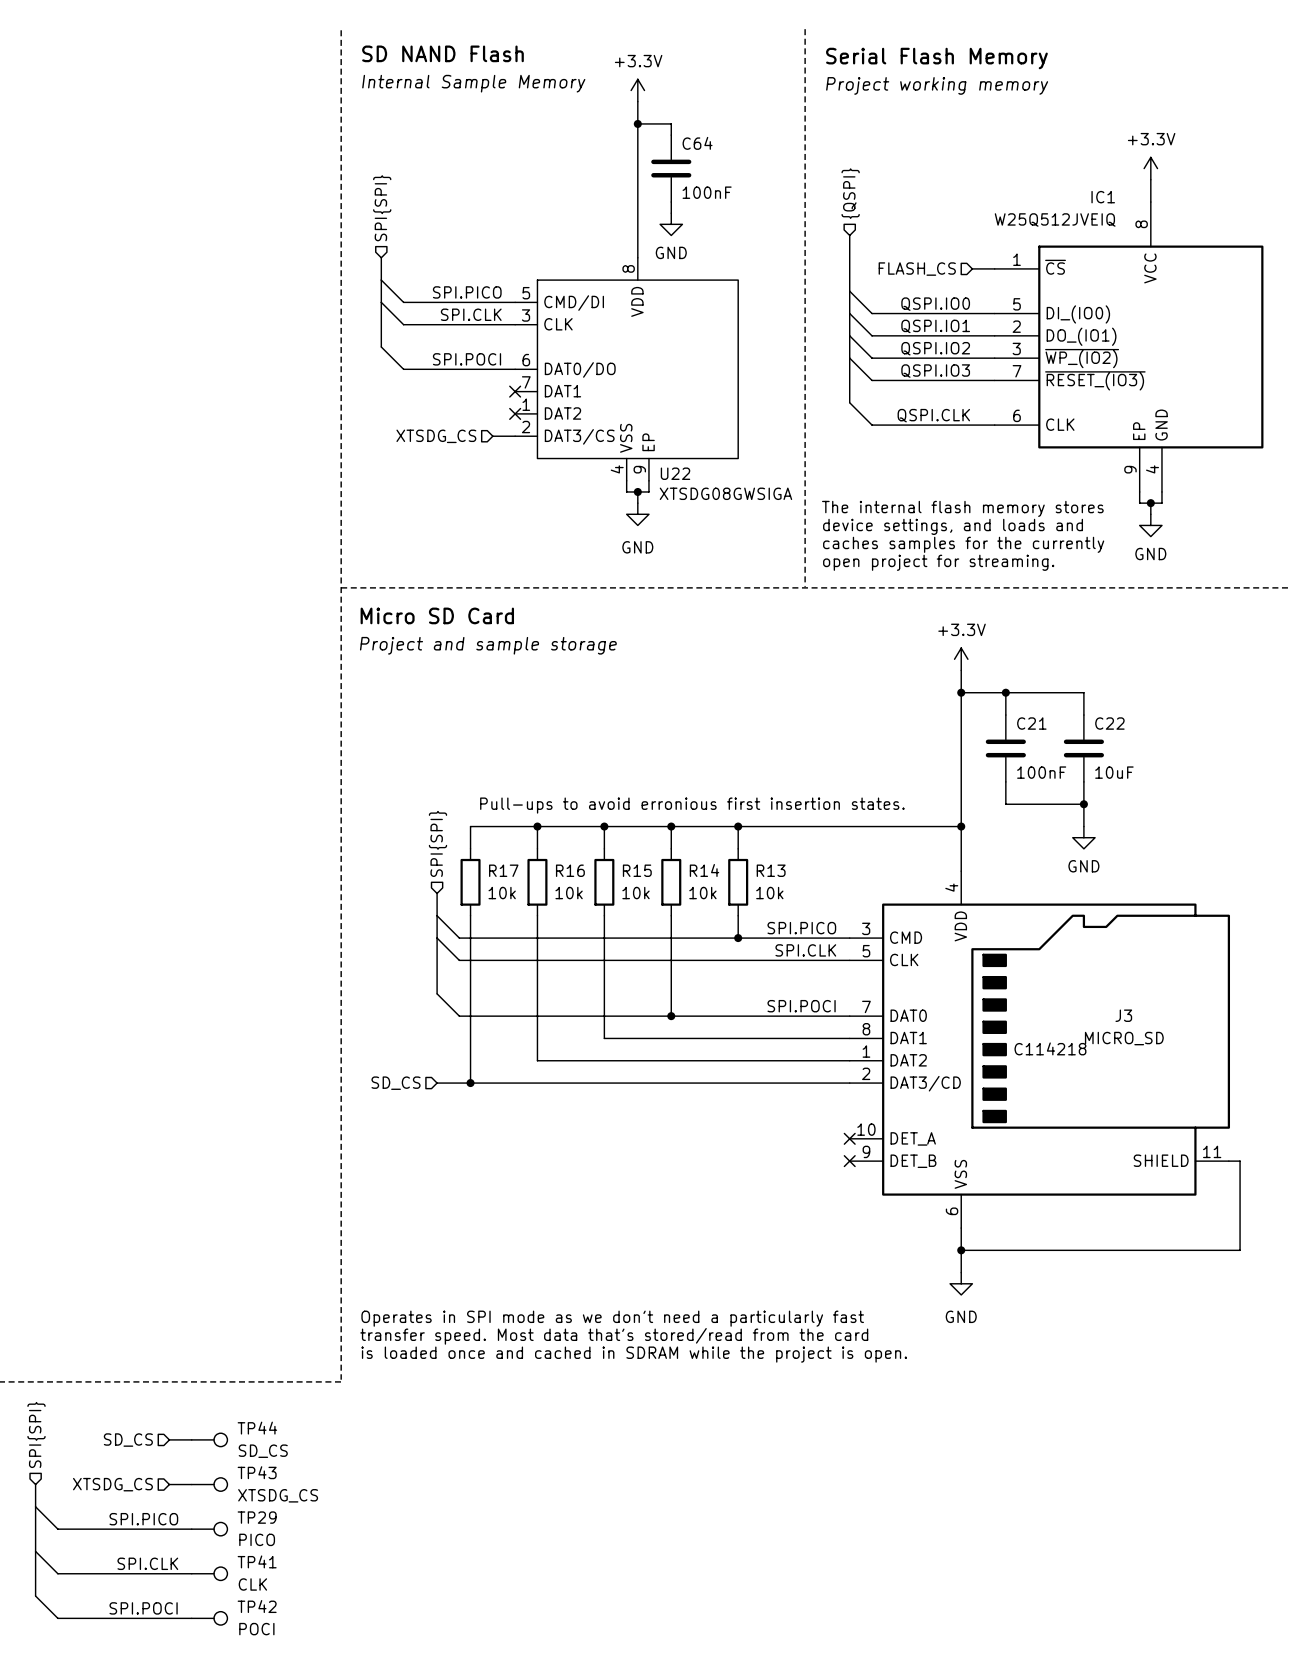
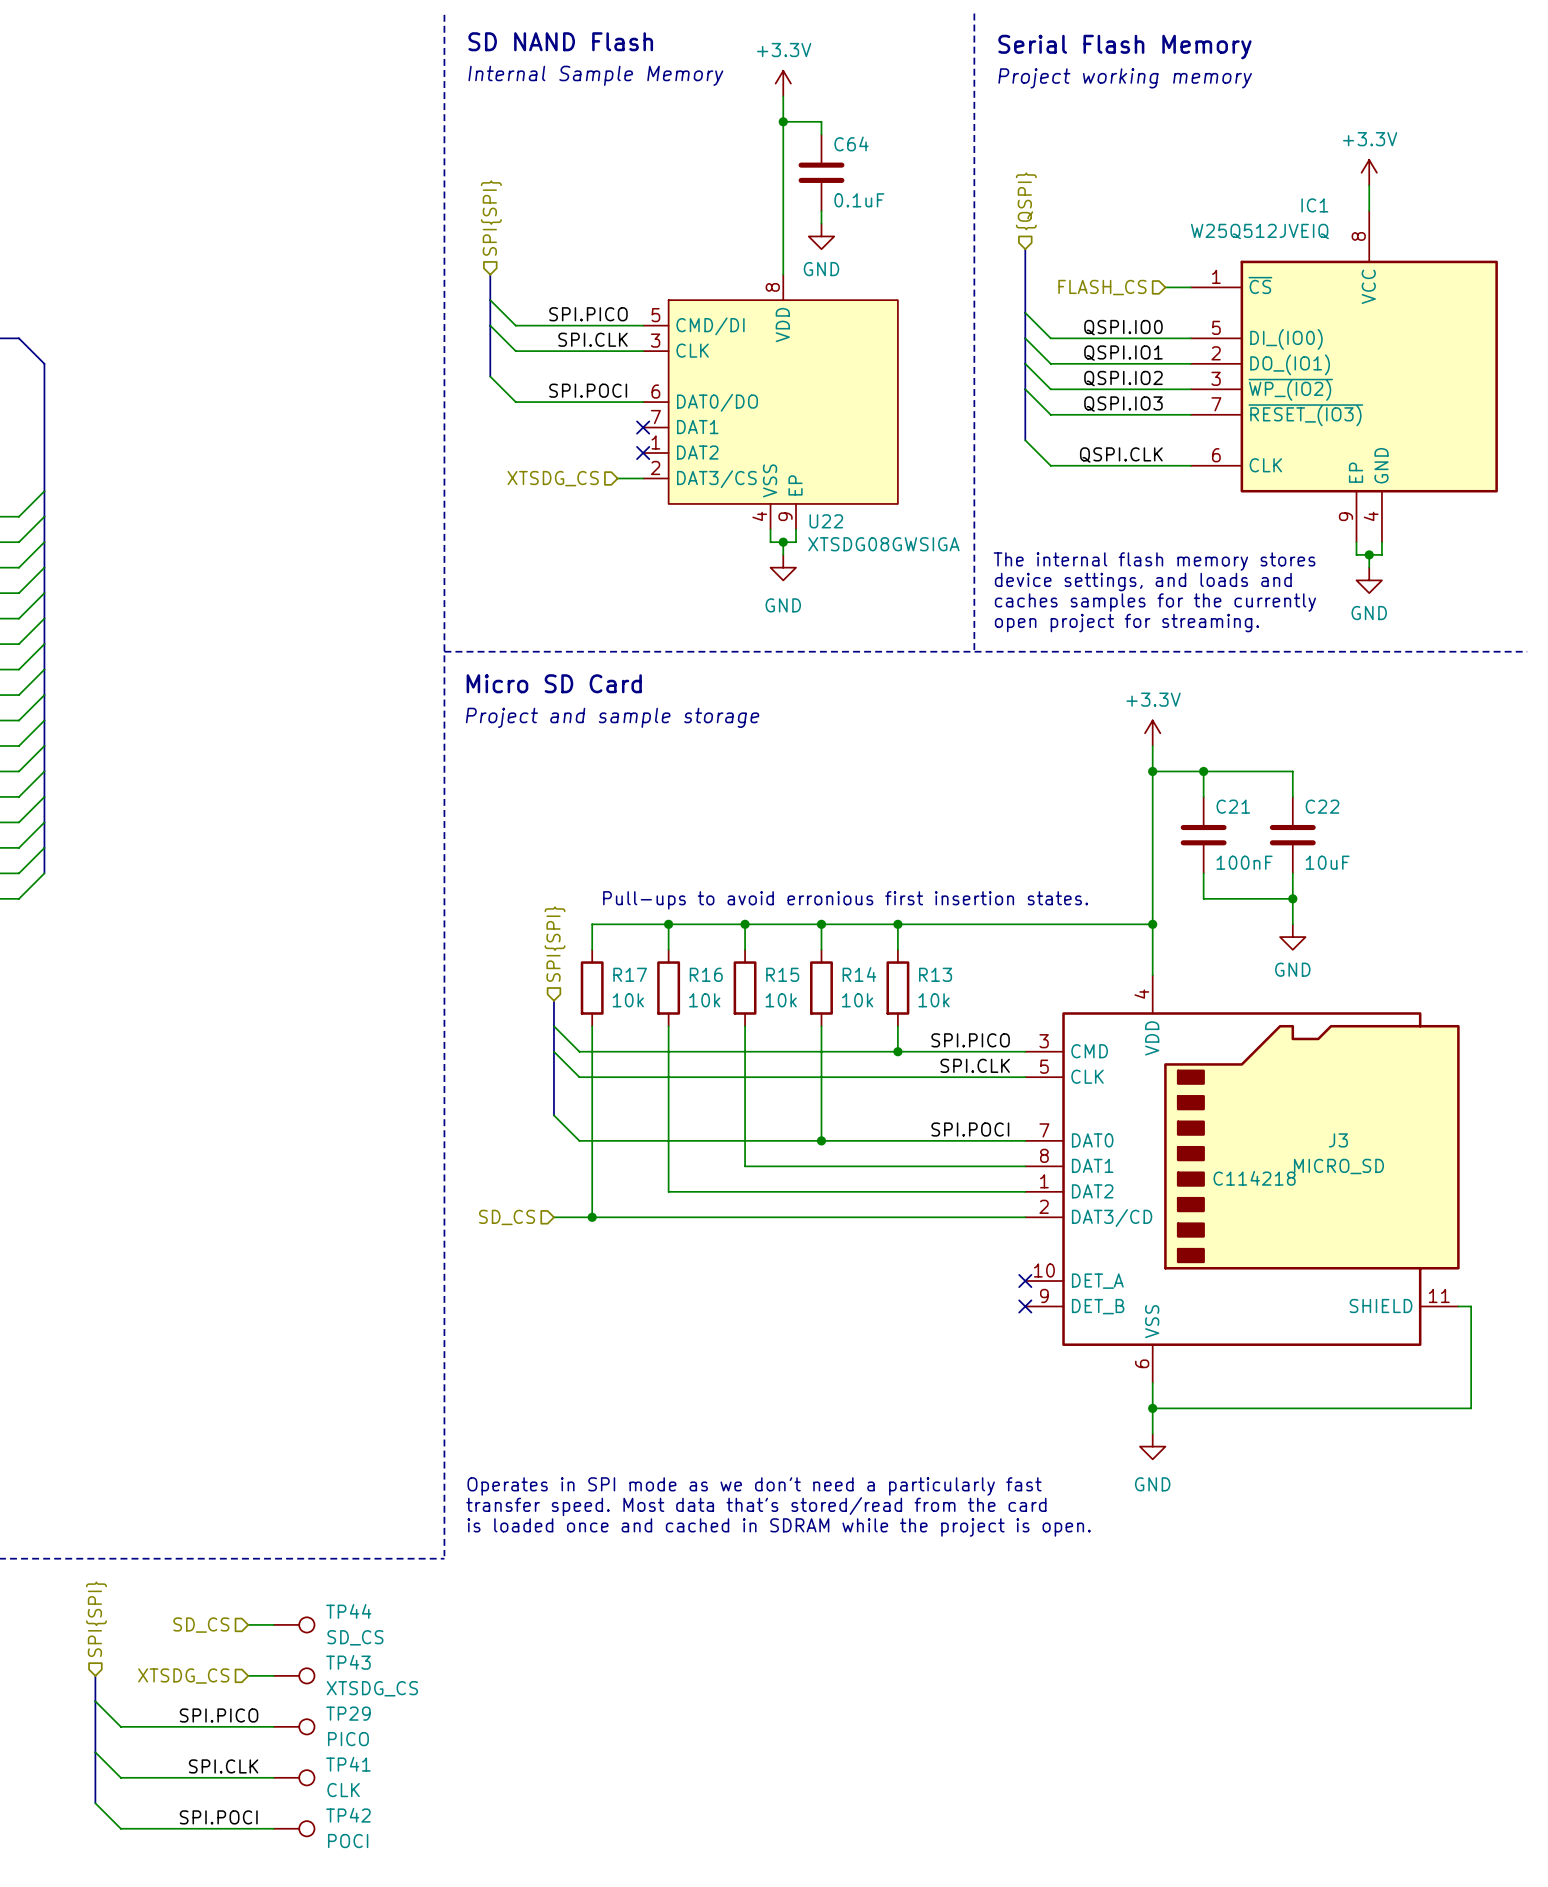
C64 value: 100nF (707, 192) -> 0.1uF (859, 200)

